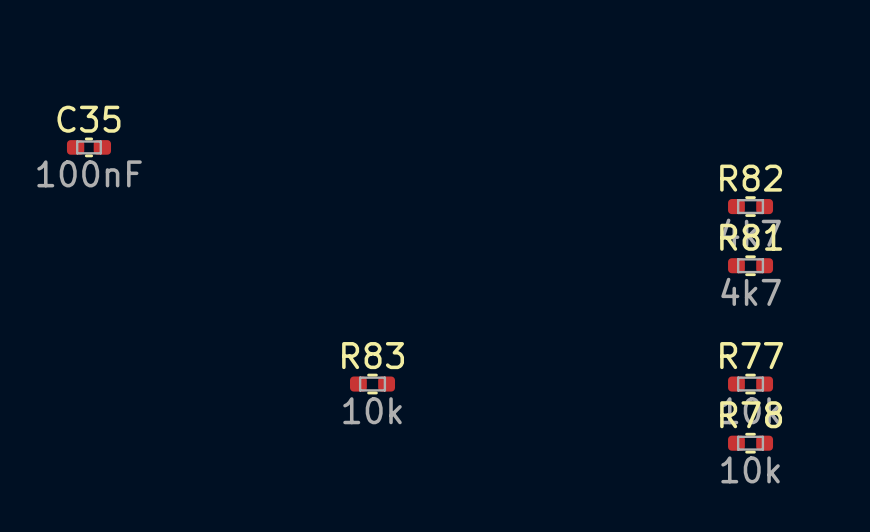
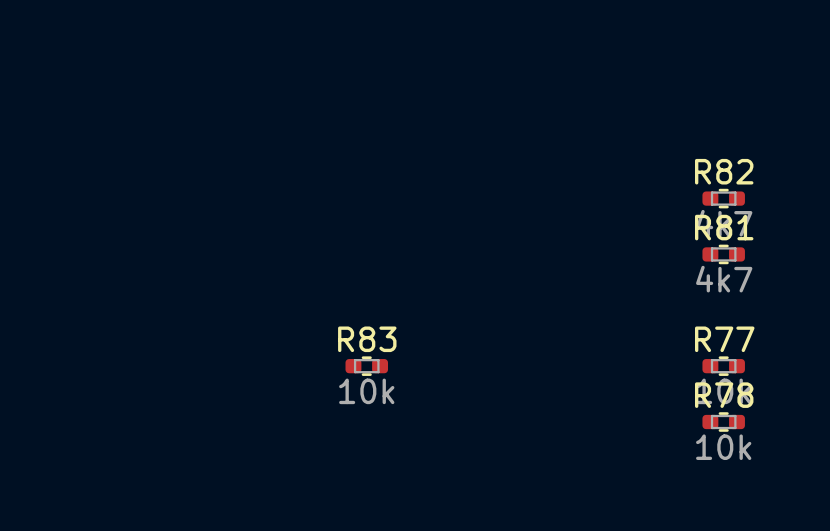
C35: 100nF (88, 147) -> none

